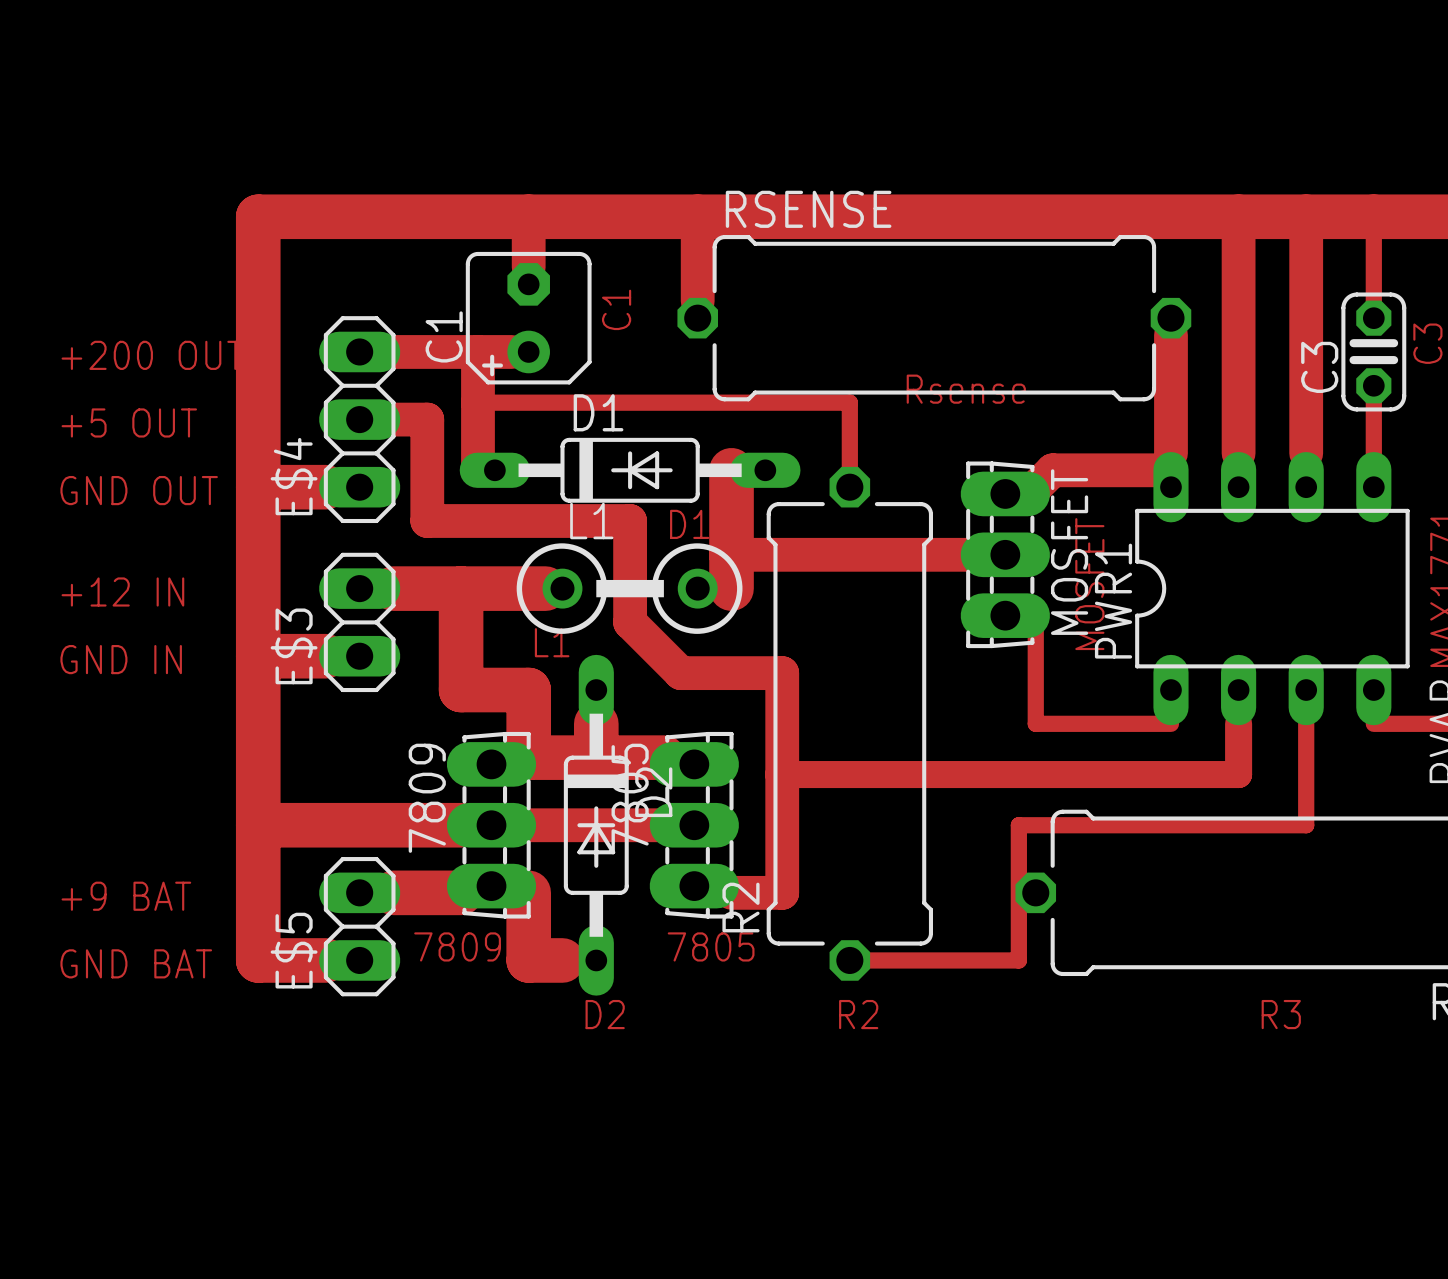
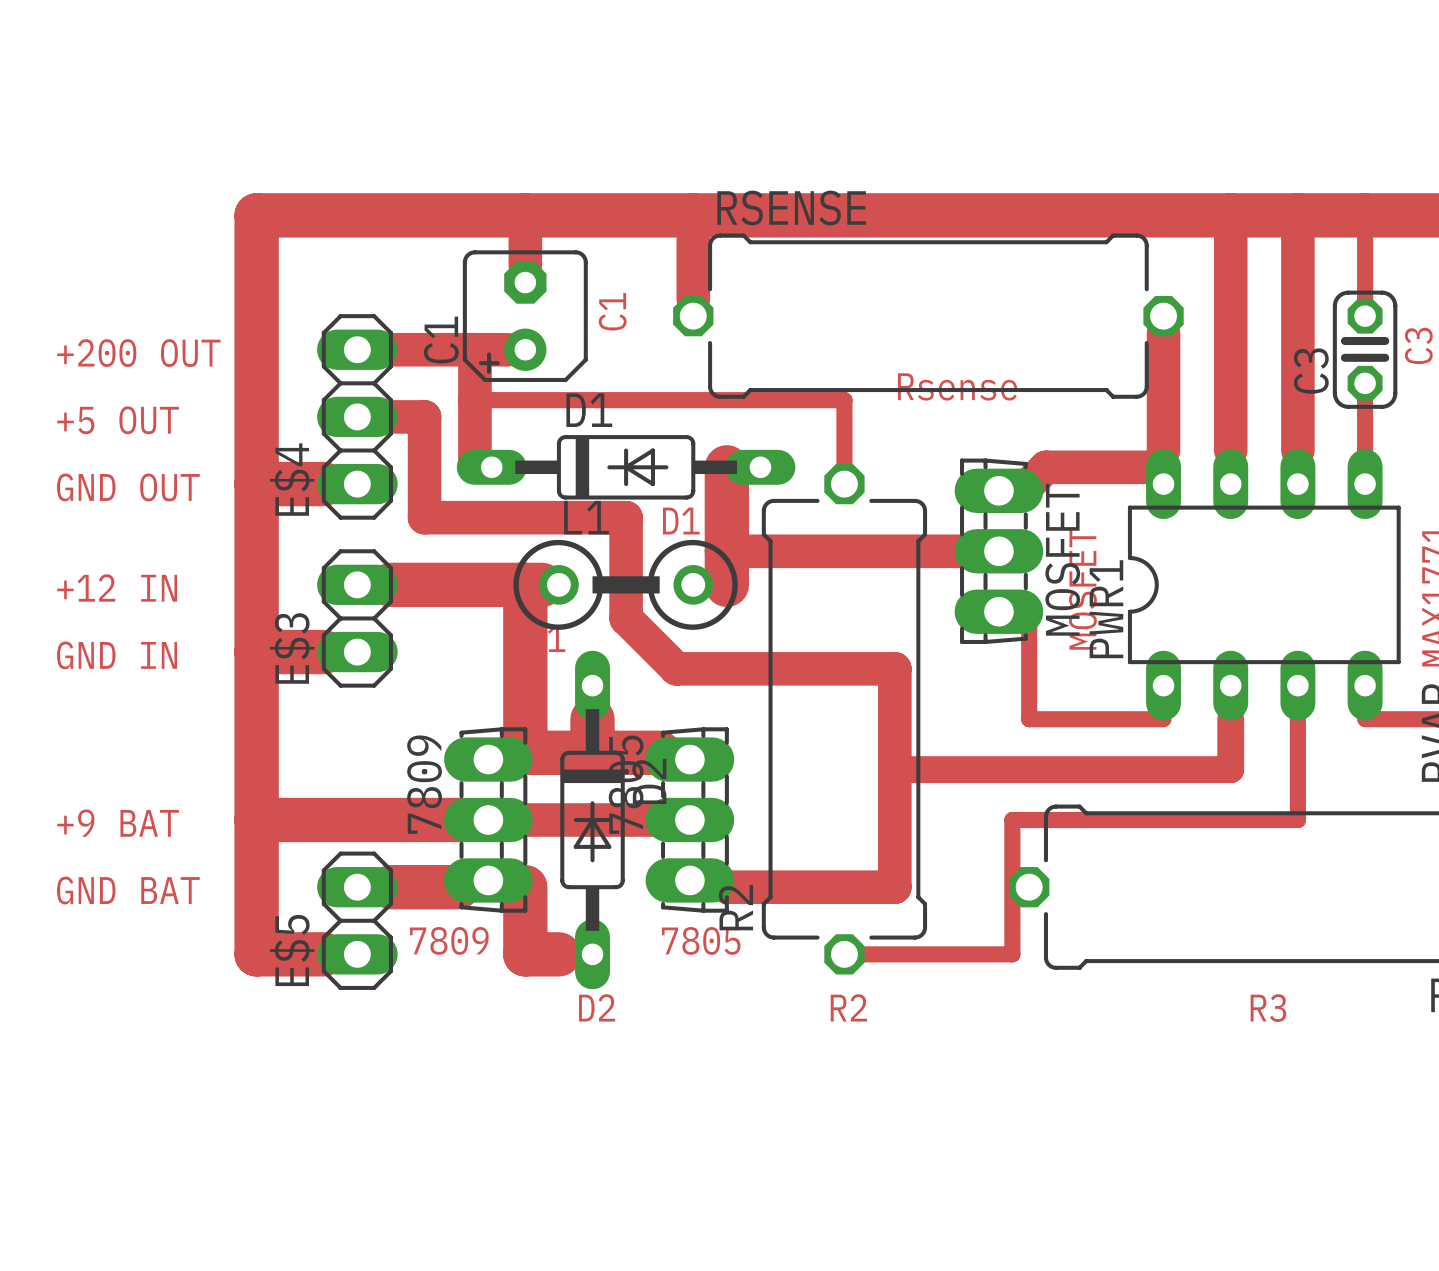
track: (461, 588) (461, 690) (528, 690) -> (525, 584) (525, 685)
track: (782, 673) (782, 892) -> (777, 668) (894, 668) (894, 887) (777, 887)
track: (782, 774) (900, 774) -> none
text: none -> +9 BAT (118, 823)
text: +9 BAT (126, 896) -> GND BAT (128, 890)
text: GND BAT (136, 963) -> none

